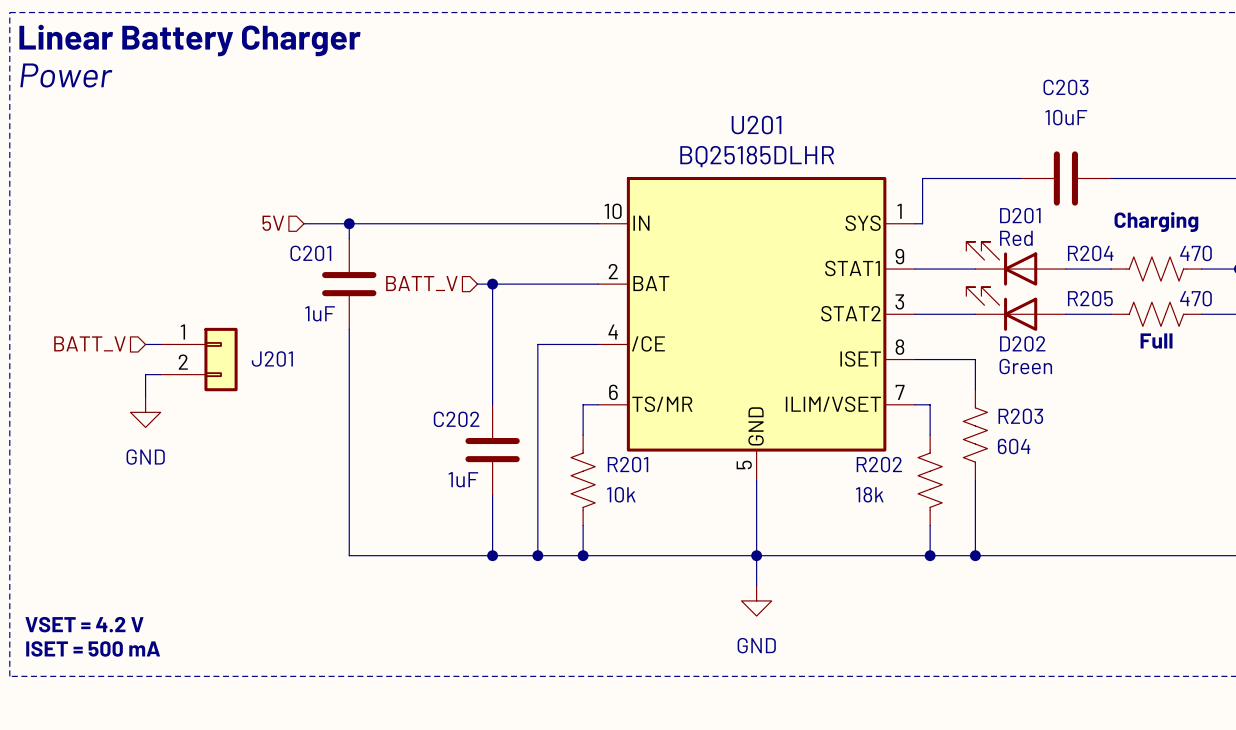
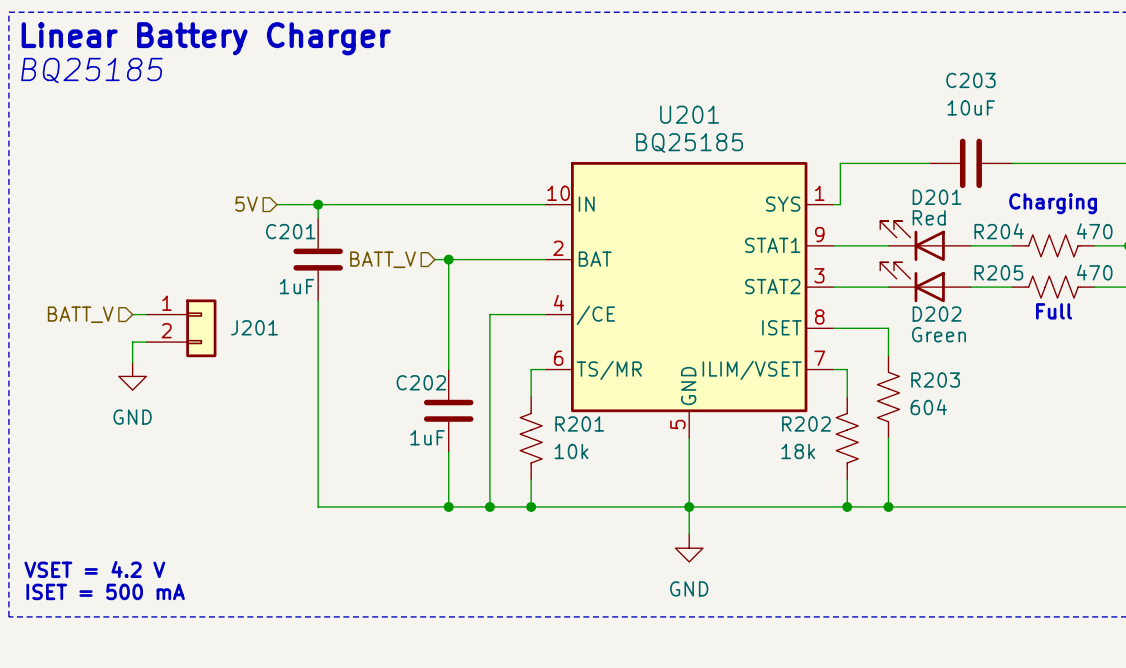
text: Power (66, 75) -> BQ25185 (91, 70)
U201 value: BQ25185DLHR (757, 156) -> BQ25185 (689, 142)

